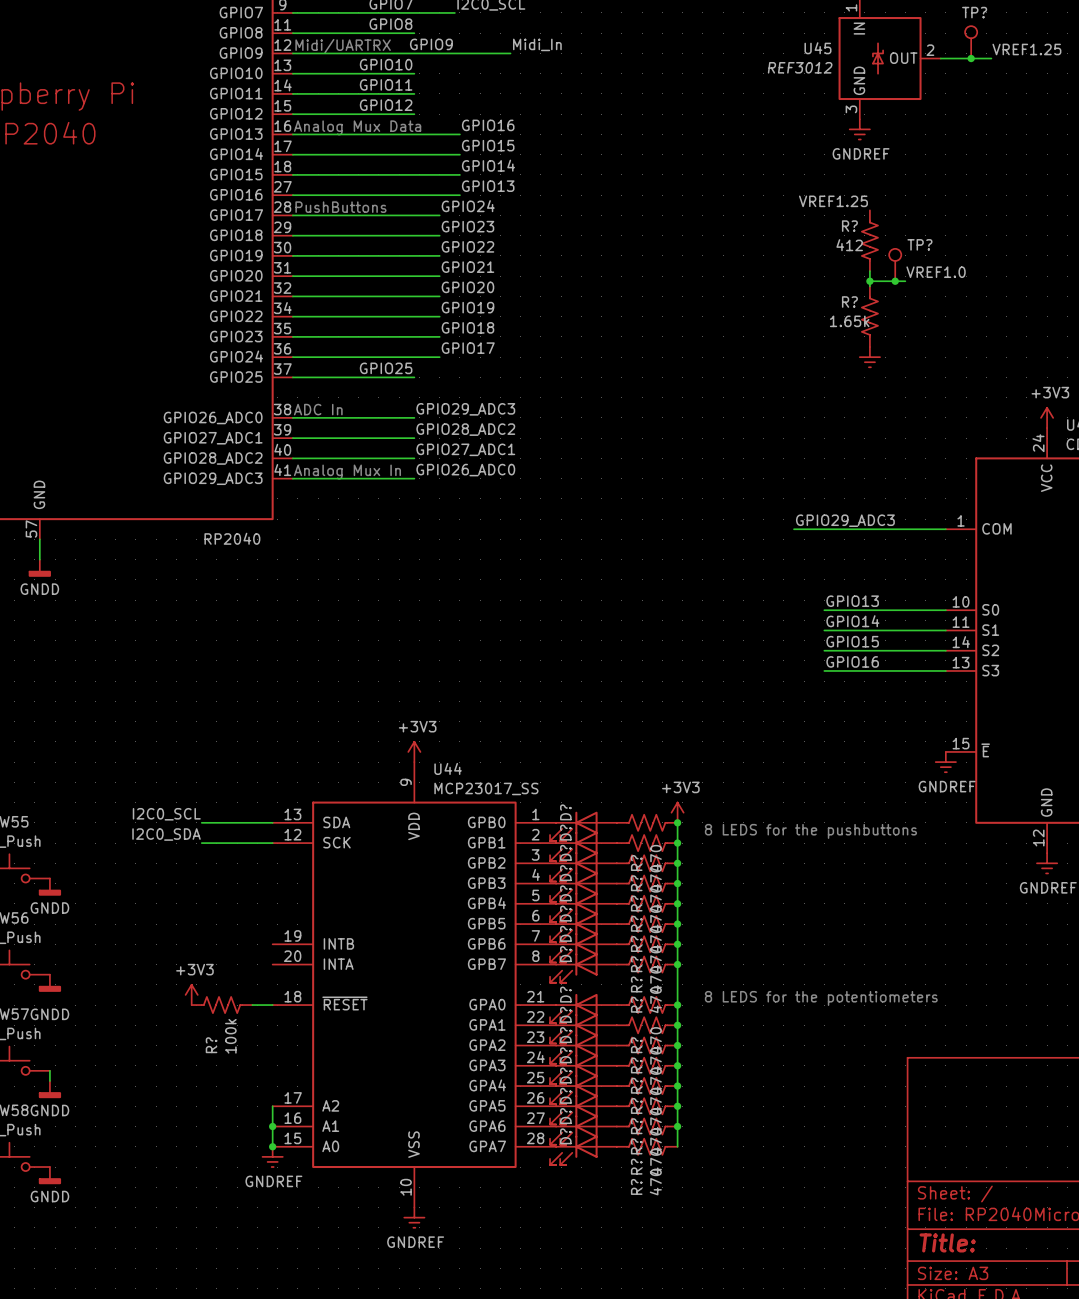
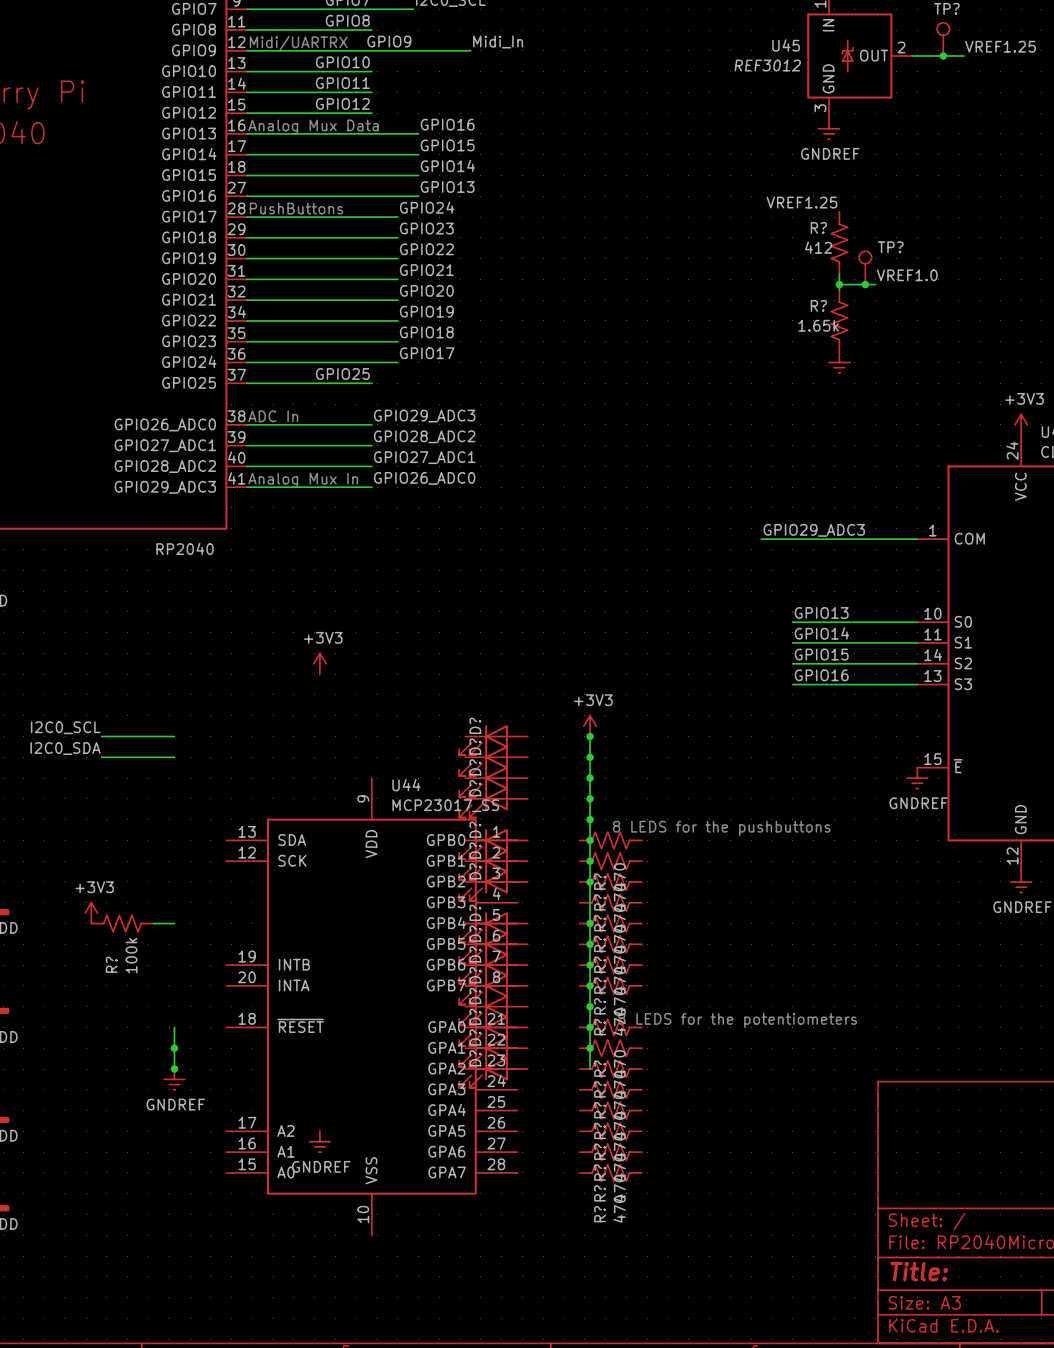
power symbol: none -> +3V3 (319, 663)
power symbol: none -> +3V3 (590, 726)
junction: none -> (590, 736)
D?: none -> (493, 740)
junction: none -> (590, 757)
D?: none -> (493, 760)
power symbol: +3V3 (414, 751) -> none
junction: none -> (590, 778)
D?: none -> (493, 781)
junction: none -> (590, 798)
D?: none -> (493, 802)
junction: none -> (590, 819)
power symbol: +3V3 (677, 812) -> none
label position: I2C0_SCL (166, 814) -> I2C0_SCL (65, 727)
wire: (201, 822) (272, 822) -> (101, 736) (174, 736)
junction: none -> (590, 840)
wire: (677, 822) (677, 1146) -> (590, 736) (590, 1069)
junction: (677, 822) -> none
D?: none -> (493, 844)
D?: (583, 826) -> none
text position: 8 LEDS for the pushbuttons (810, 831) -> 8 LEDS for the pushbuttons (721, 828)
label position: I2C0_SDA (166, 834) -> I2C0_SDA (65, 748)
wire: (201, 843) (272, 843) -> (101, 757) (174, 757)
junction: none -> (590, 861)
junction: (677, 843) -> none
D?: none -> (493, 864)
D?: (583, 846) -> none
junction: none -> (590, 881)
junction: (677, 863) -> none
D?: none -> (493, 885)
D?: (583, 866) -> none
junction: (677, 883) -> none
D?: (583, 887) -> none
power symbol: none -> +3V3 (91, 913)
junction: none -> (590, 923)
junction: (677, 903) -> none
D?: none -> (493, 927)
D?: (583, 907) -> none
junction: none -> (590, 944)
junction: (677, 924) -> none
D?: none -> (493, 947)
D?: (583, 927) -> none
junction: none -> (590, 965)
junction: (677, 944) -> none
D?: none -> (493, 968)
D?: (583, 947) -> none
junction: none -> (590, 985)
junction: (677, 964) -> none
D?: none -> (493, 989)
D?: (583, 968) -> none
junction: none -> (590, 1006)
D?: none -> (493, 1010)
power symbol: +3V3 (191, 994) -> none
text position: 8 LEDS for the potentiometers (821, 998) -> 8 LEDS for the potentiometers (737, 1020)
R? position: (222, 1005) -> (122, 923)
wire: (252, 1005) (272, 1005) -> (153, 923) (174, 923)
junction: none -> (590, 1027)
junction: (677, 1005) -> none
D?: none -> (493, 1031)
D?: (583, 1008) -> none
junction: none -> (174, 1048)
junction: none -> (590, 1048)
junction: (677, 1025) -> none
D?: none -> (493, 1051)
D?: (583, 1028) -> none
junction: none -> (174, 1069)
junction: (677, 1045) -> none
D?: none -> (493, 1072)
D?: (583, 1049) -> none
power symbol: none -> GNDREF (174, 1079)
junction: (677, 1065) -> none
D?: (583, 1069) -> none
junction: (677, 1086) -> none
D?: (583, 1089) -> none
wire: (272, 1106) (272, 1146) -> (174, 1027) (174, 1069)
junction: (677, 1106) -> none
D?: (583, 1109) -> none
power symbol: none -> GNDREF (319, 1141)
junction: (272, 1126) -> none
junction: (677, 1126) -> none
D?: (583, 1130) -> none
junction: (272, 1146) -> none
D?: (583, 1150) -> none
power symbol: GNDREF (272, 1156) -> none
power symbol: GNDREF (414, 1217) -> none

